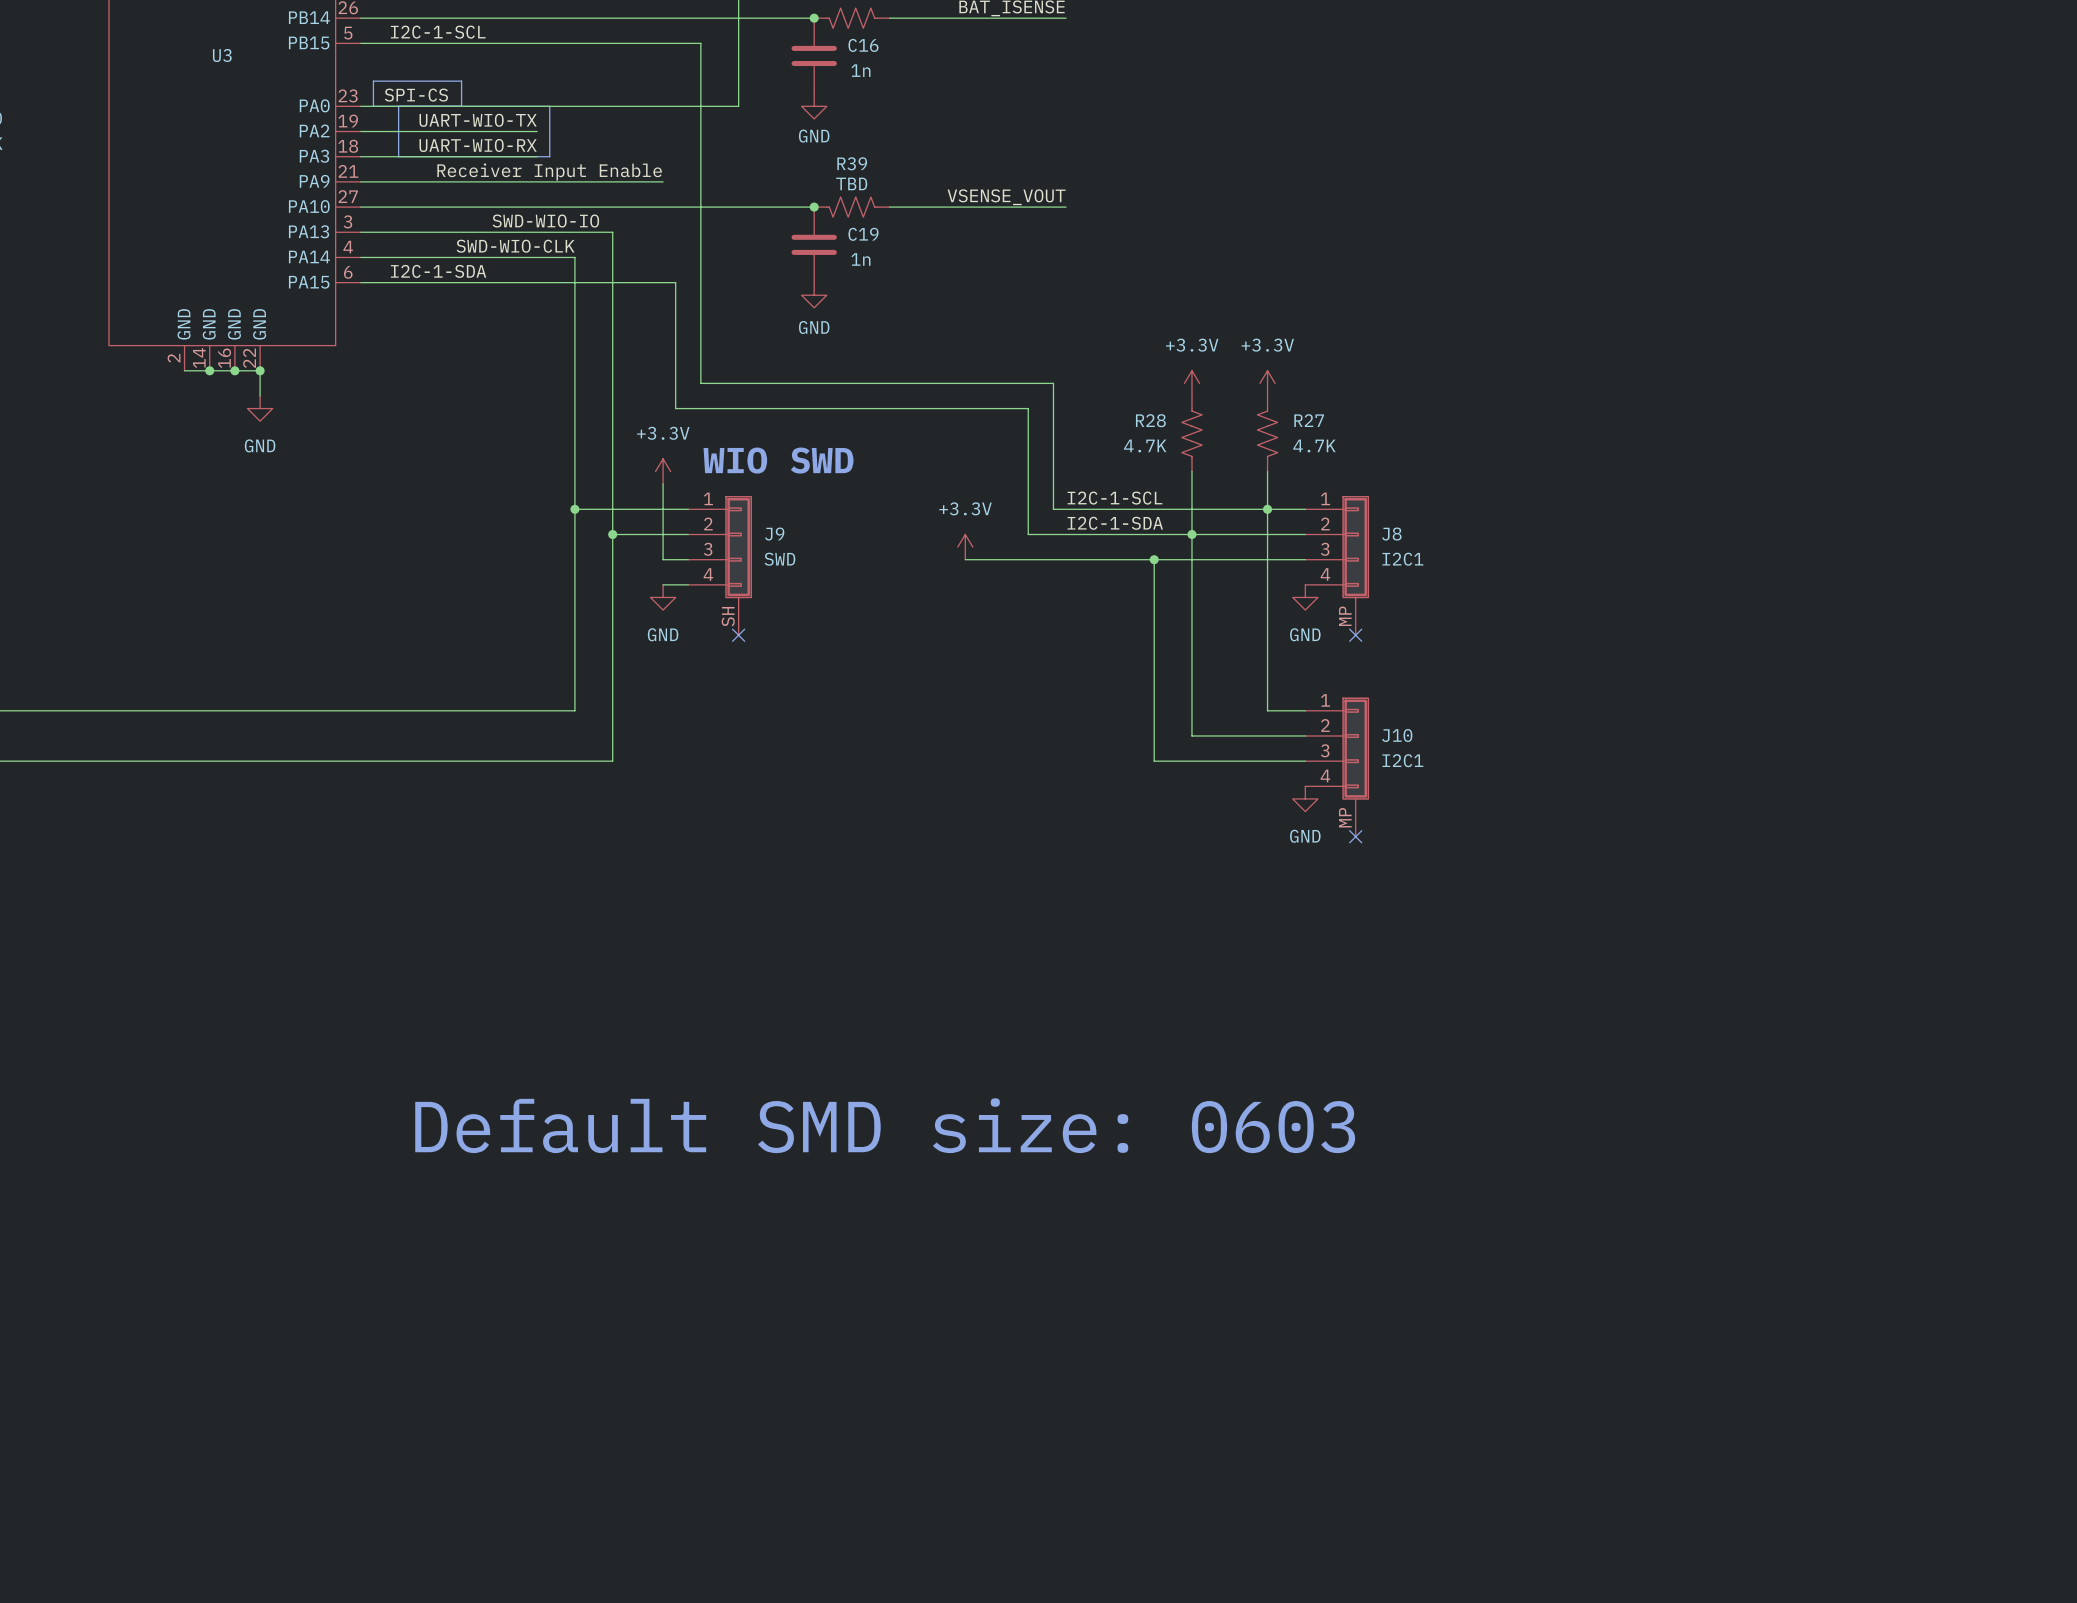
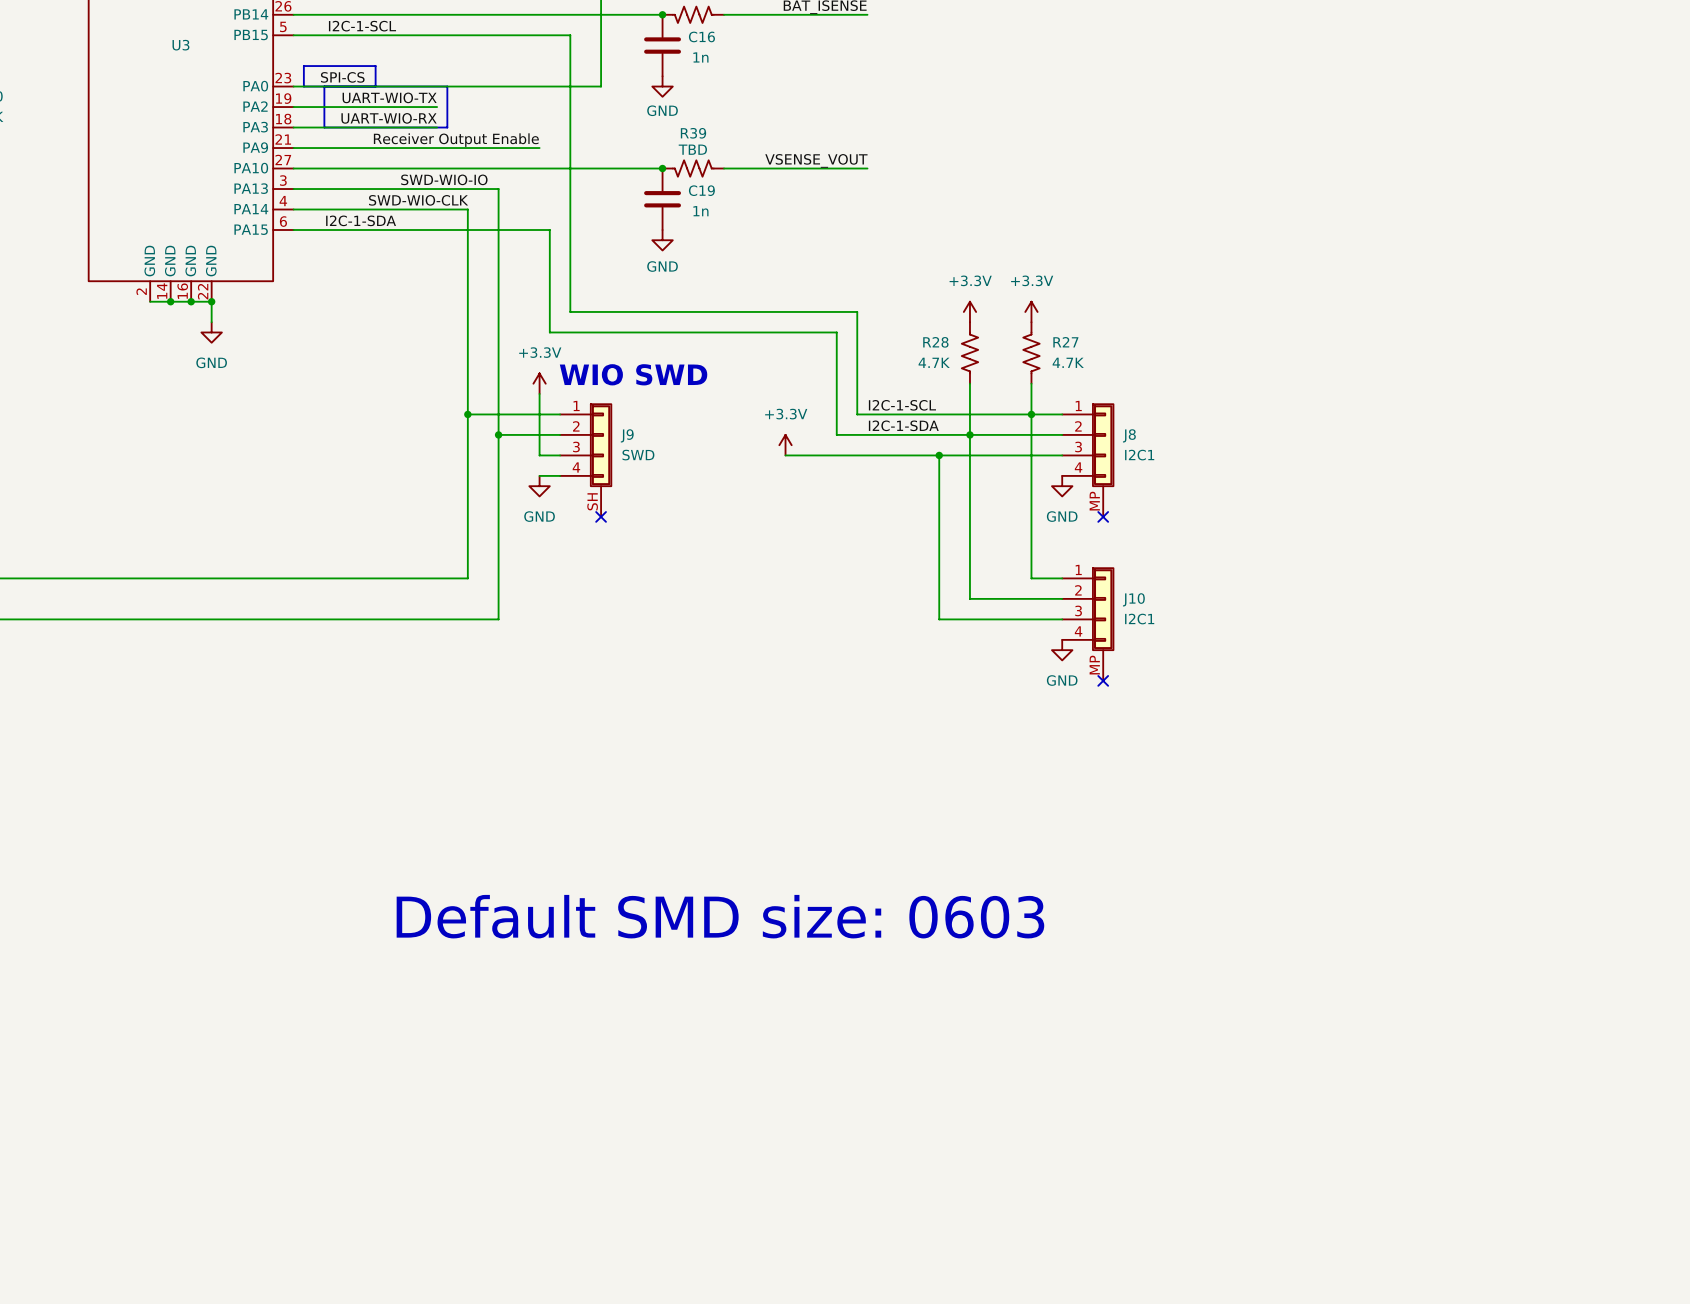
label: Receiver Input Enable (549, 172) -> Receiver Output Enable (456, 140)

